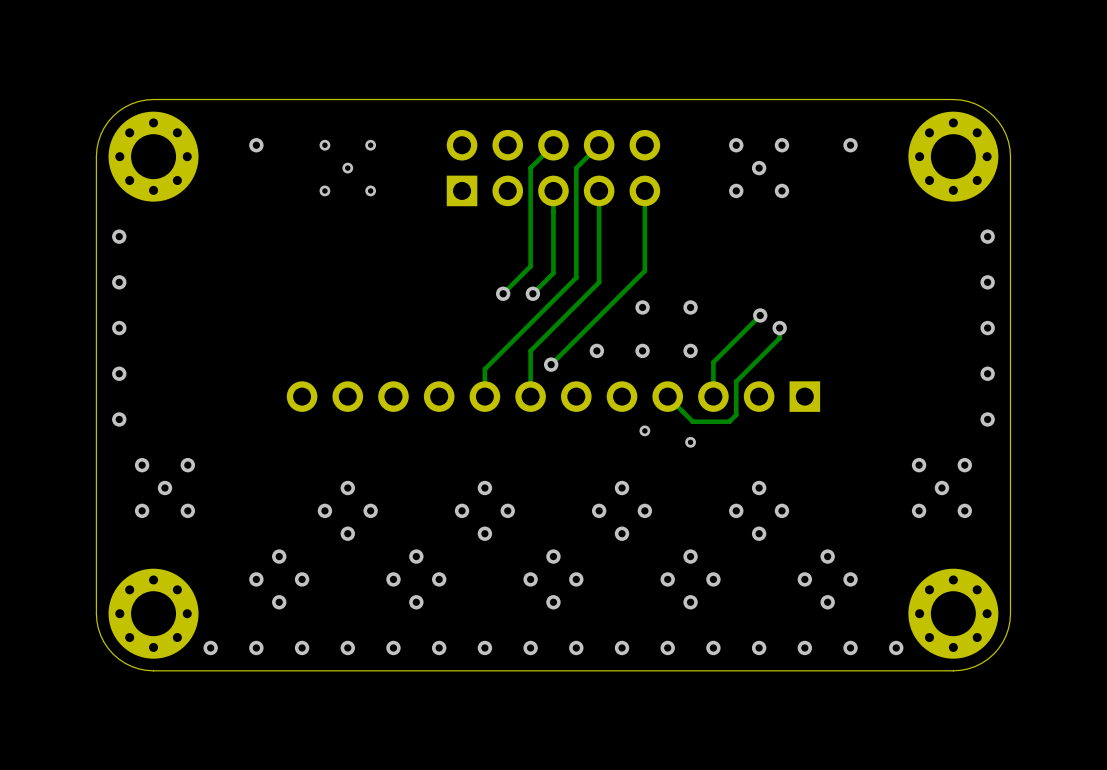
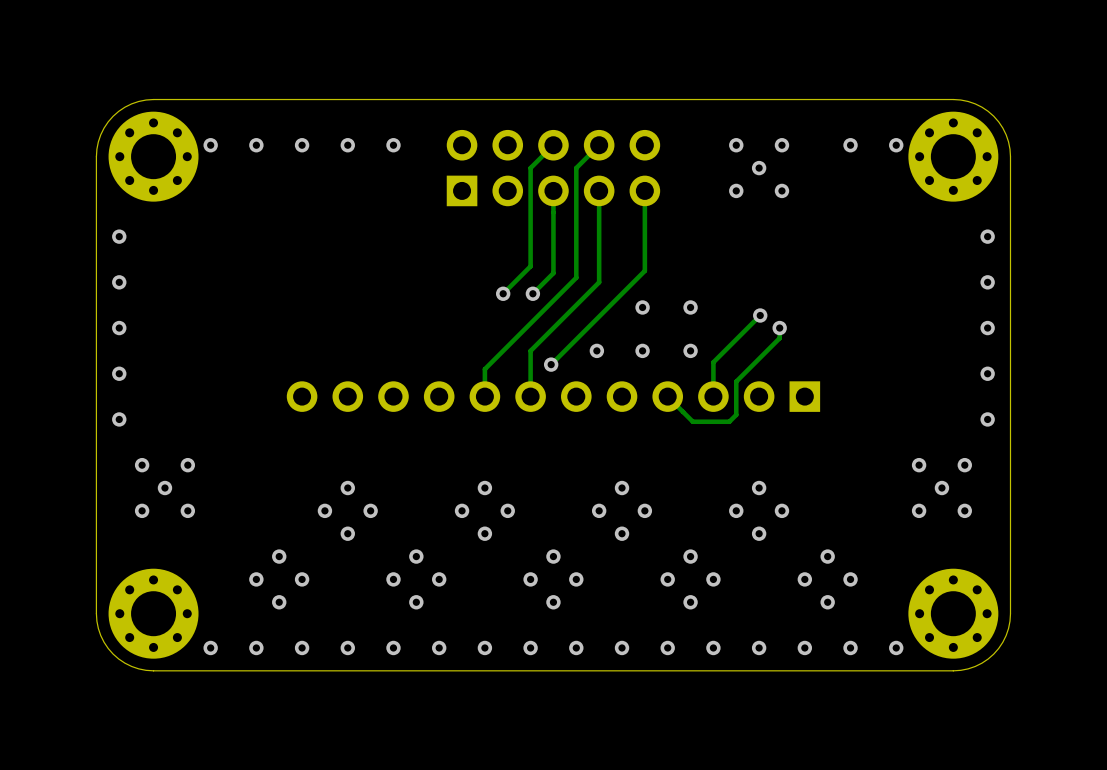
via: none -> (210, 145)
via: none -> (302, 145)
via: (324, 145) -> none
via: none -> (347, 145)
via: (370, 145) -> none
via: none -> (393, 145)
via: none -> (896, 145)
via: (347, 168) -> none
via: (324, 190) -> none
via: (370, 190) -> none
via: (644, 430) -> none
via: (690, 442) -> none

